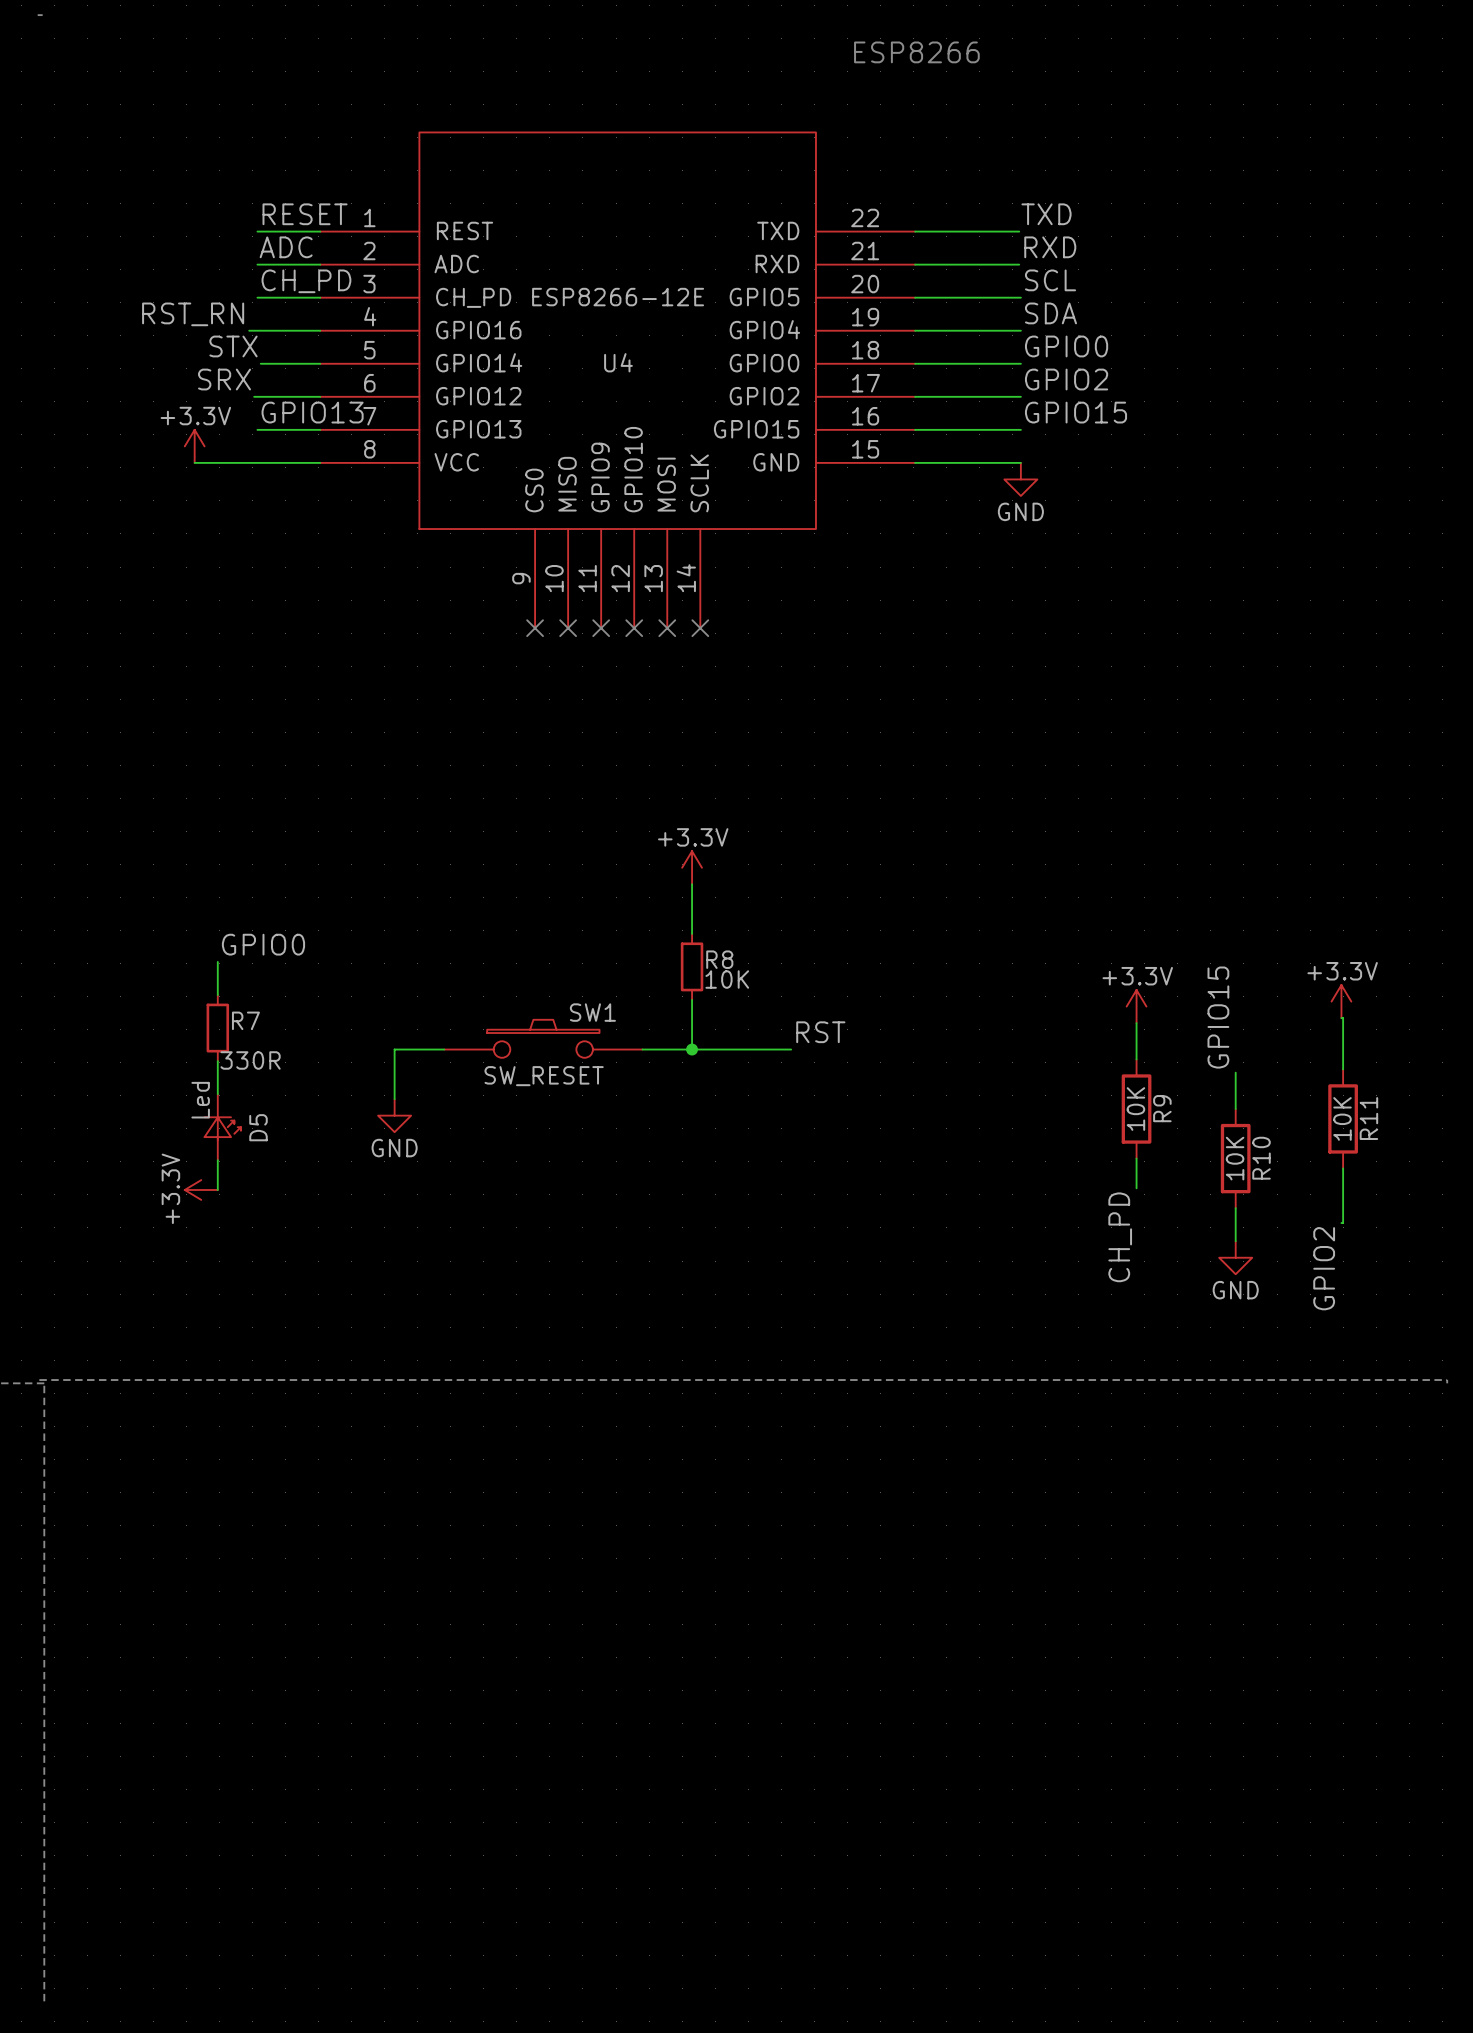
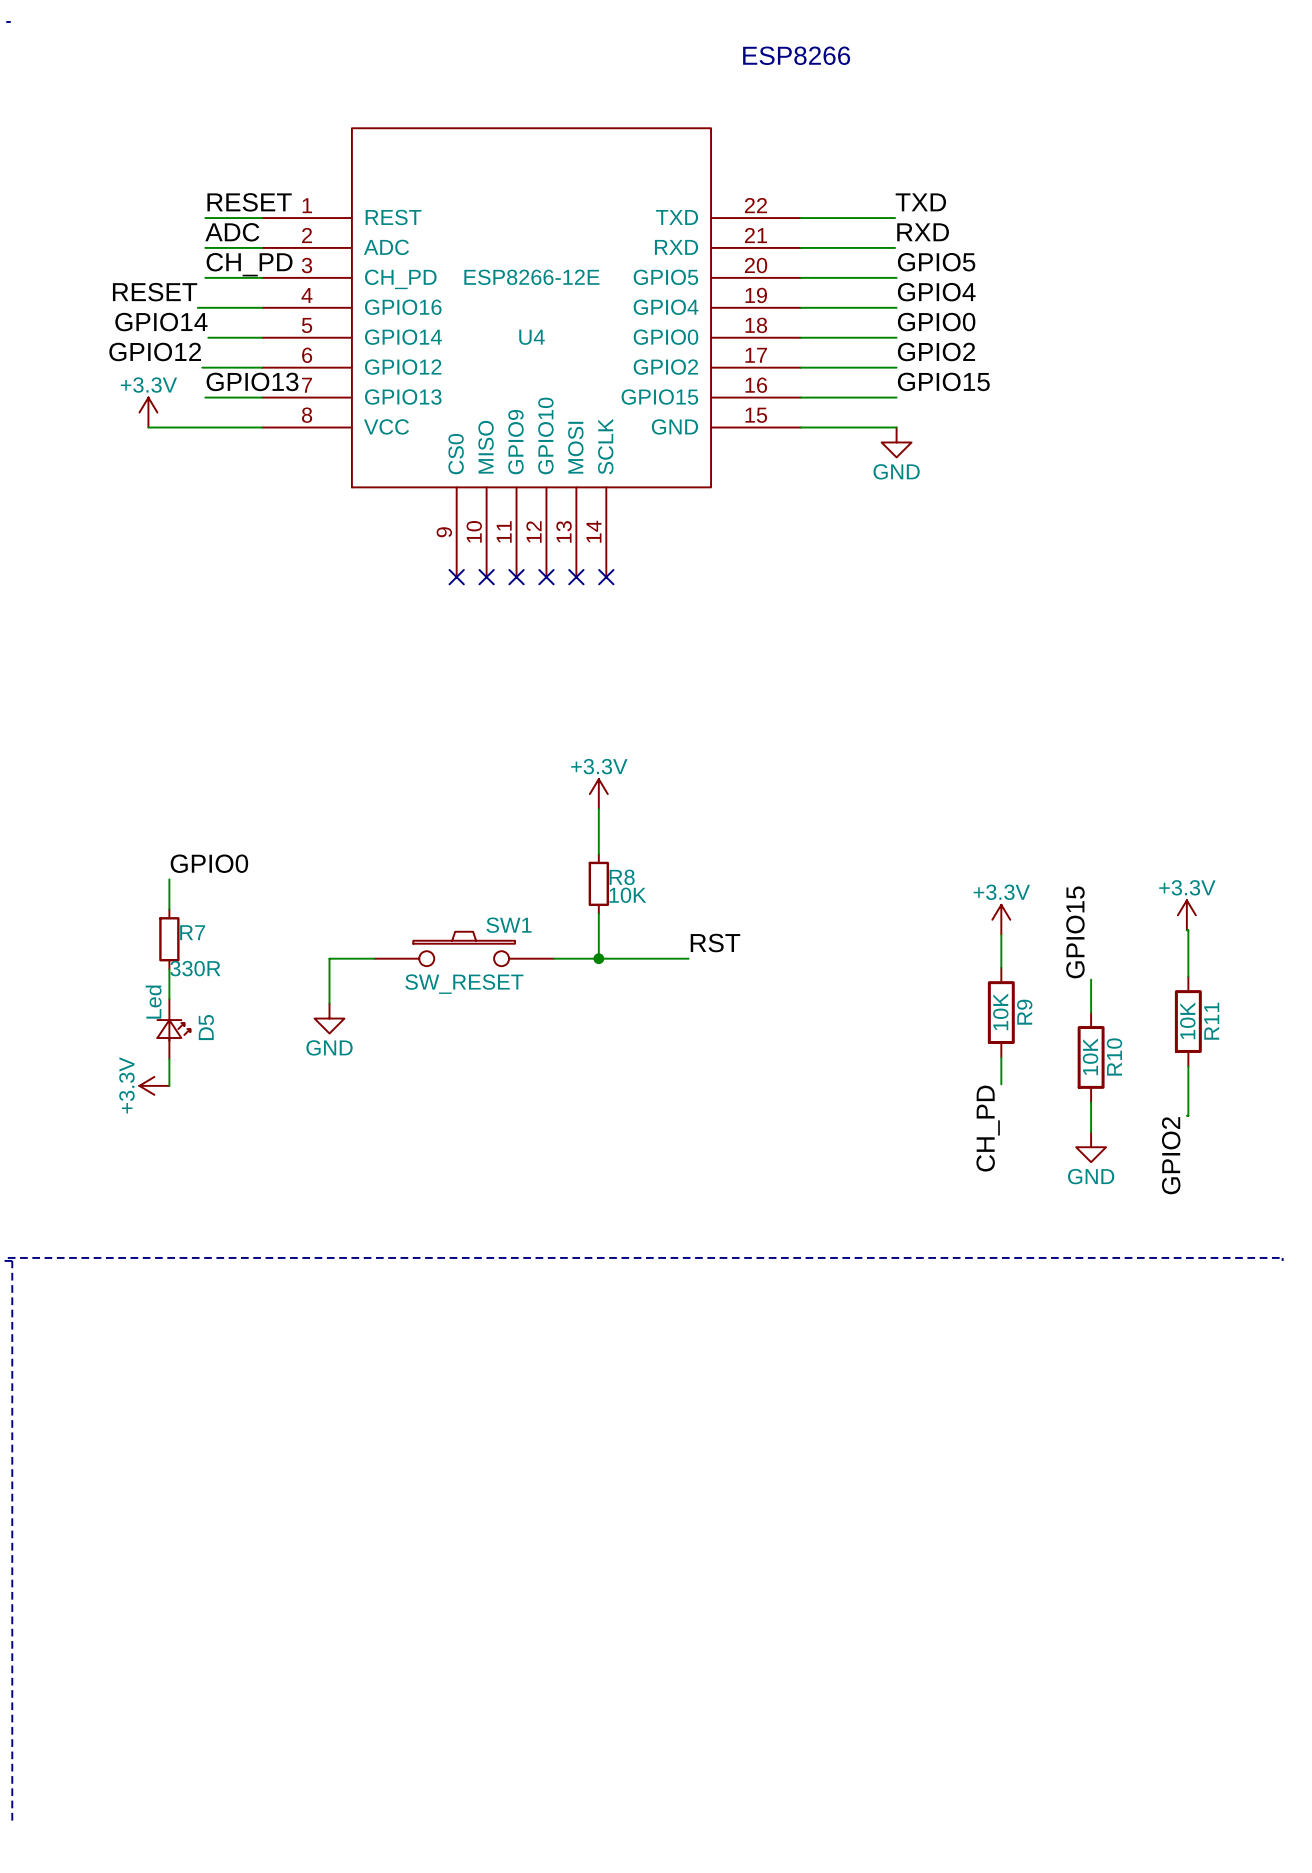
label: SCL (1050, 280) -> GPIO5 (936, 262)
label: SDA (1050, 313) -> GPIO4 (936, 292)
label: RST_RN (193, 314) -> RESET (155, 292)
label: STX (233, 346) -> GPIO14 (161, 322)
label: SRX (224, 379) -> GPIO12 (155, 351)

